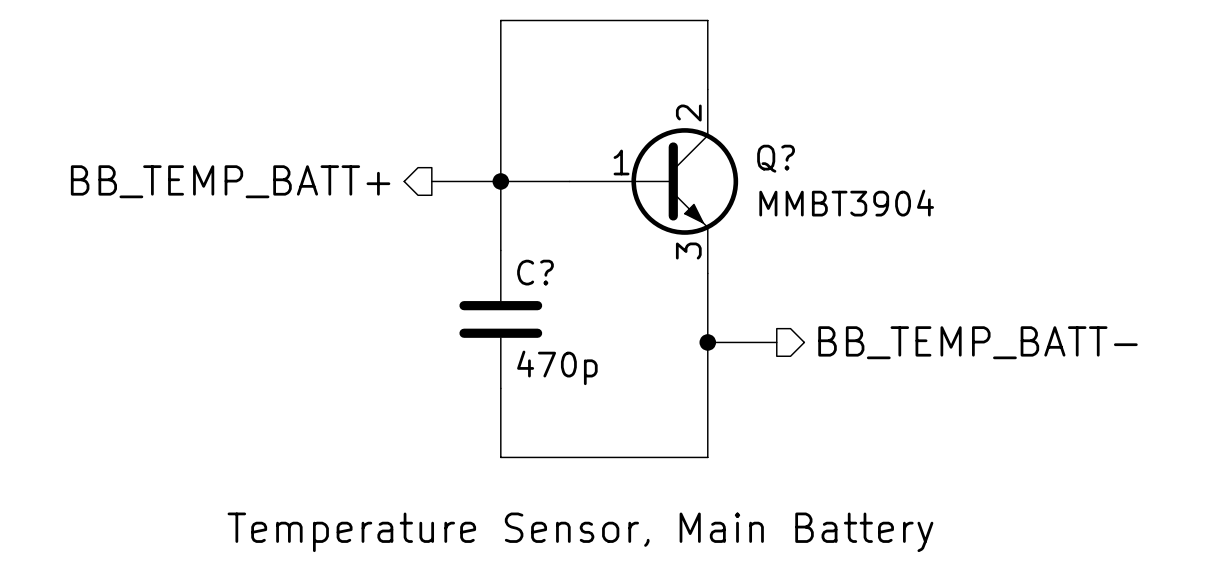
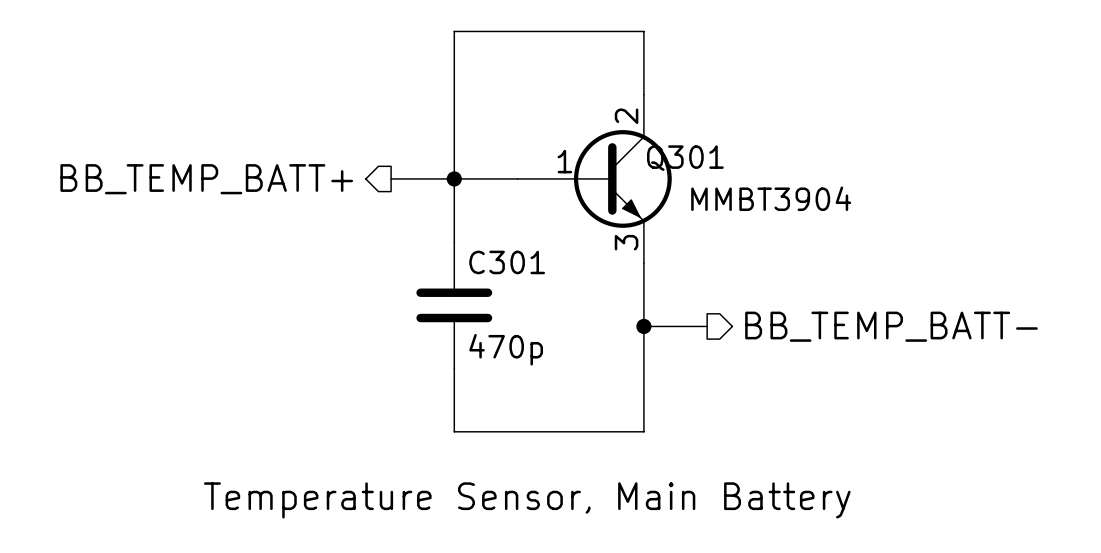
Q? name: Q? (776, 158) -> Q301 (685, 158)
C? name: C? (535, 272) -> C301 (507, 262)

